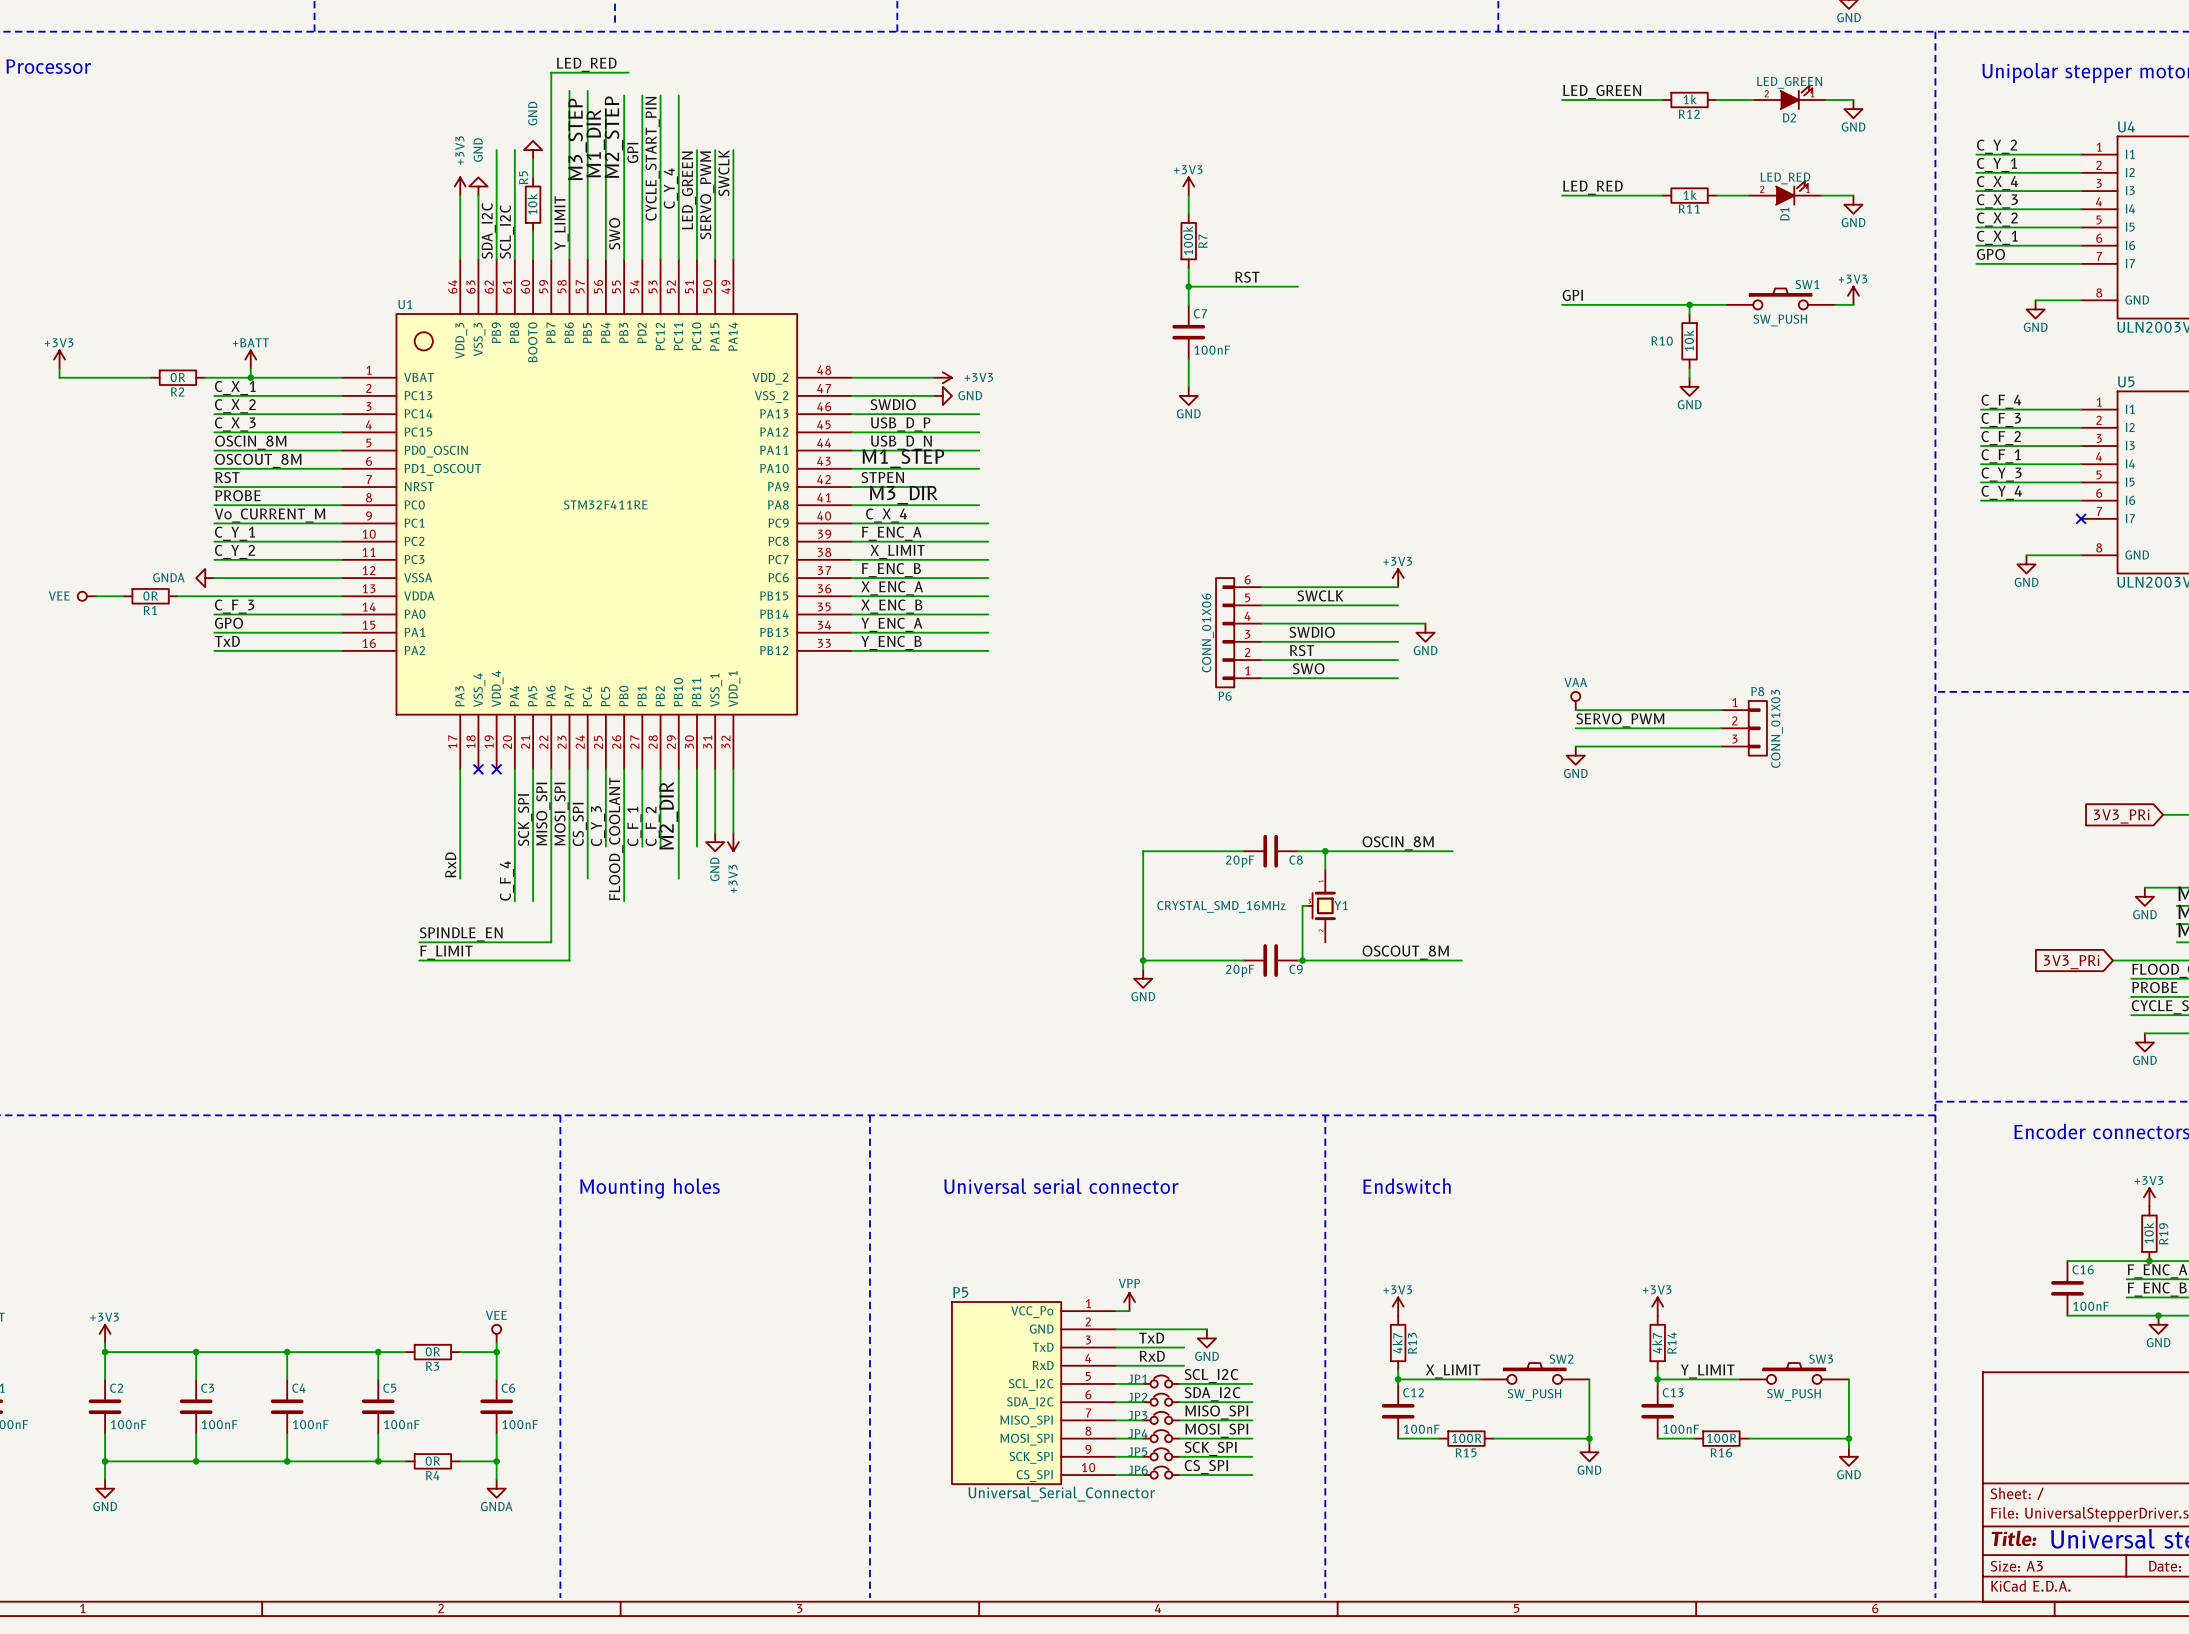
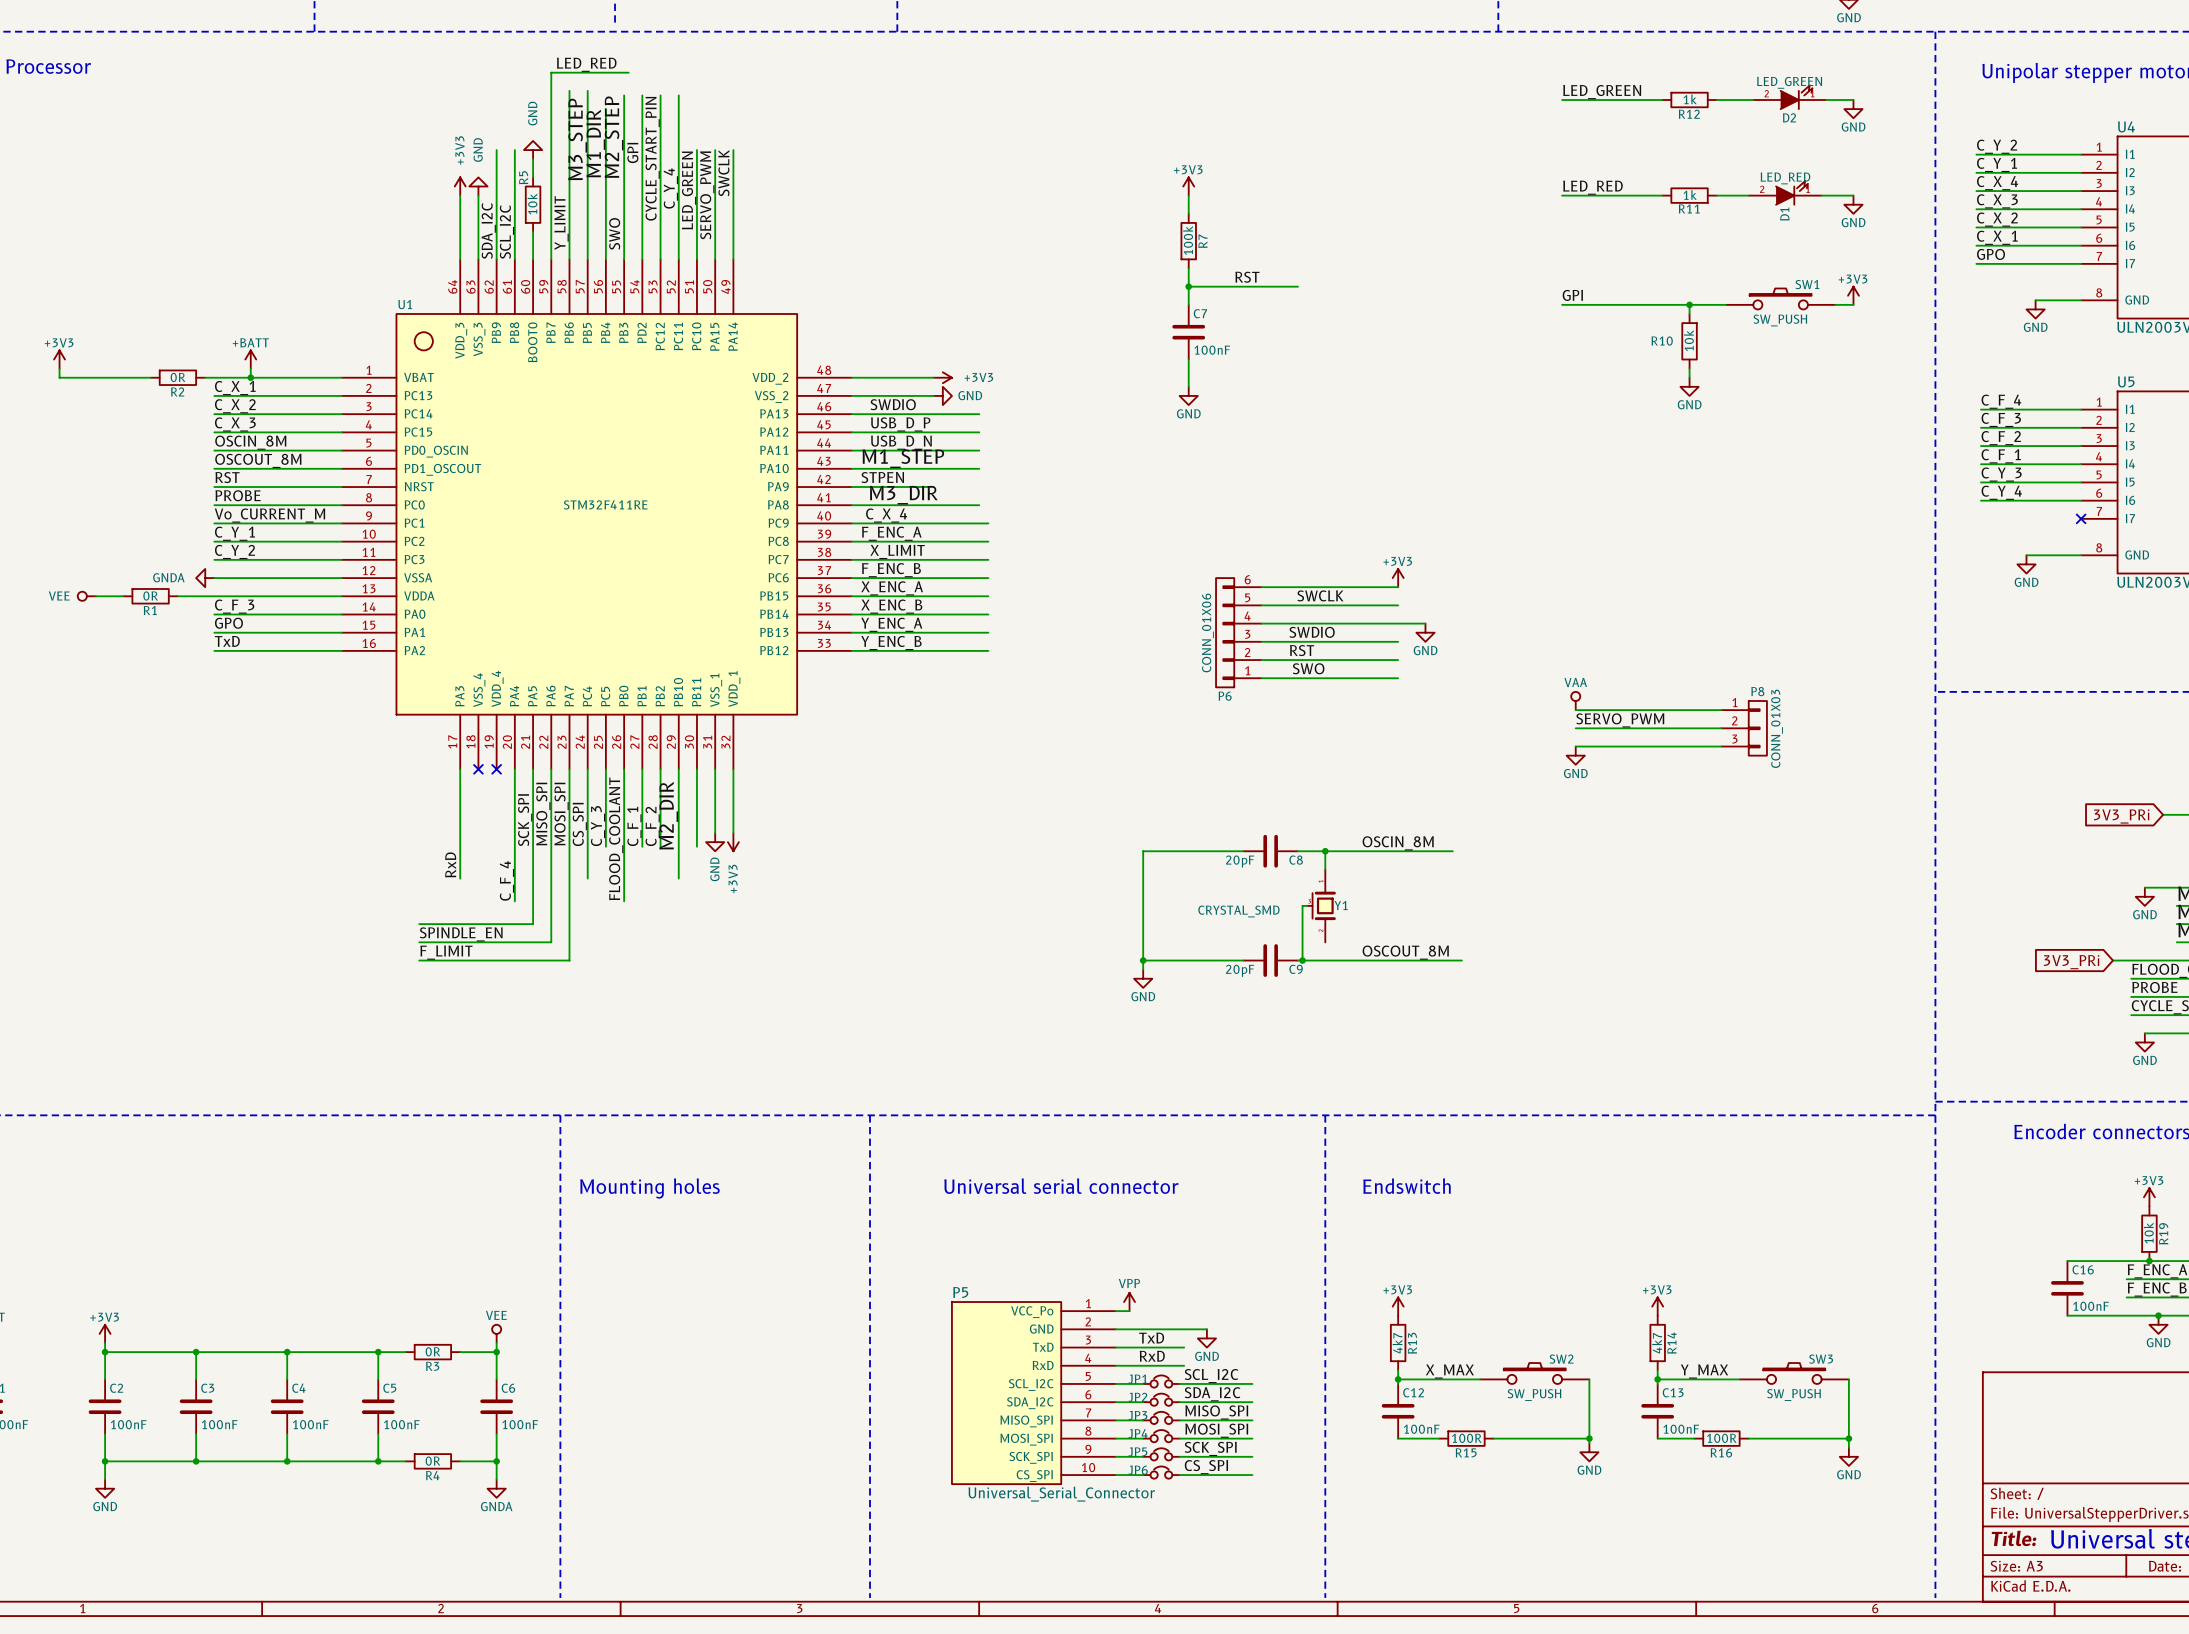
wire: none -> (533, 901) (533, 924) (419, 924)
Y1 value: CRYSTAL_SMD_16MHz (1221, 906) -> CRYSTAL_SMD (1238, 911)
label: X_LIMIT (1453, 1371) -> X_MAX (1449, 1371)
label: Y_LIMIT (1707, 1371) -> Y_MAX (1704, 1371)

